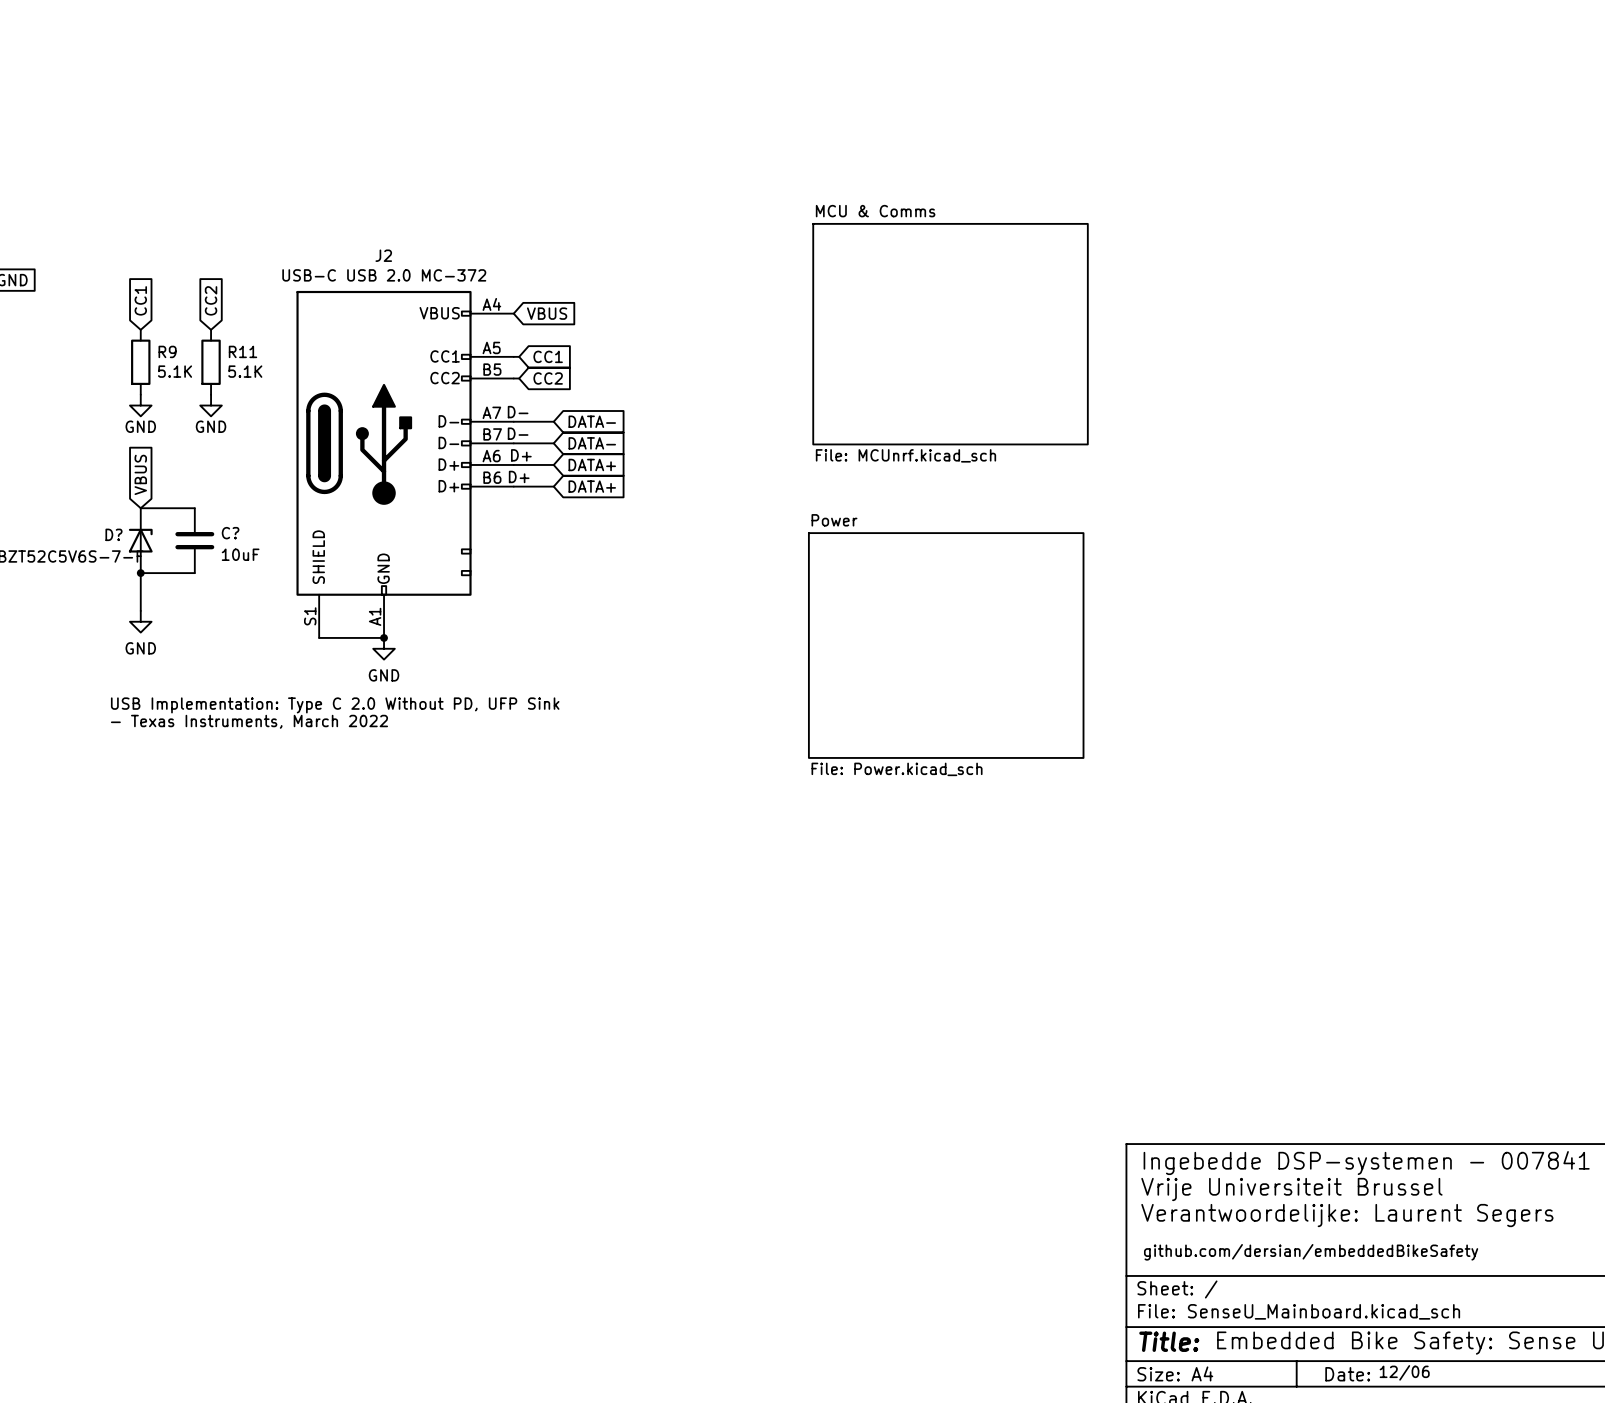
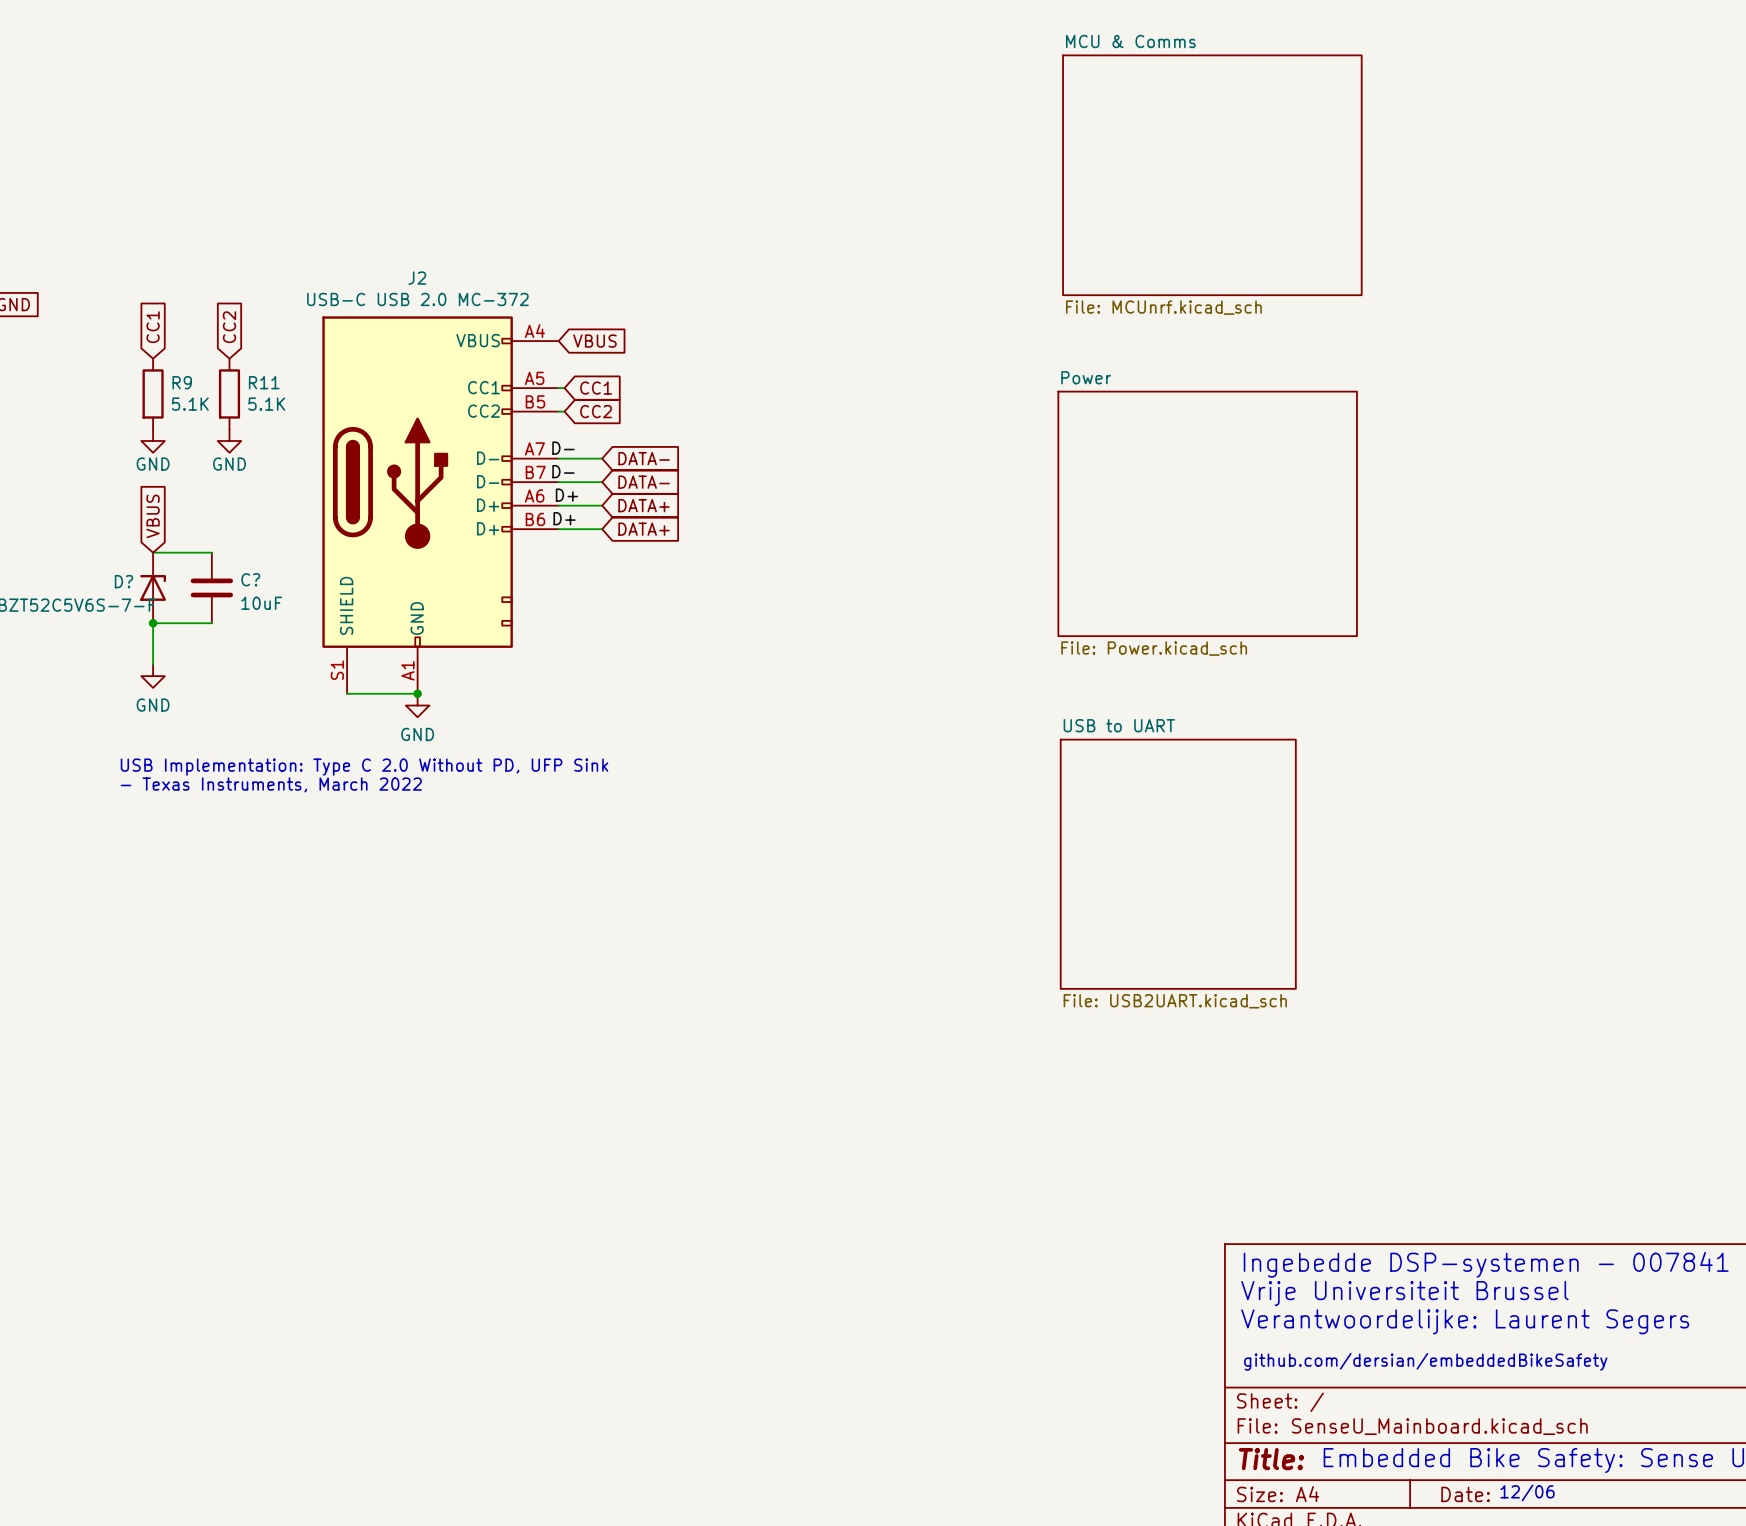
sheet MCU & Comms: none -> File: MCUnrf.kicad_sch (1212, 175)
sheet MCU & Comms: File: MCUnrf.kicad_sch (950, 334) -> none
sheet Power: none -> File: Power.kicad_sch (1207, 513)
sheet Power: File: Power.kicad_sch (946, 645) -> none
sheet USB to UART: none -> File: USB2UART.kicad_sch (1178, 864)

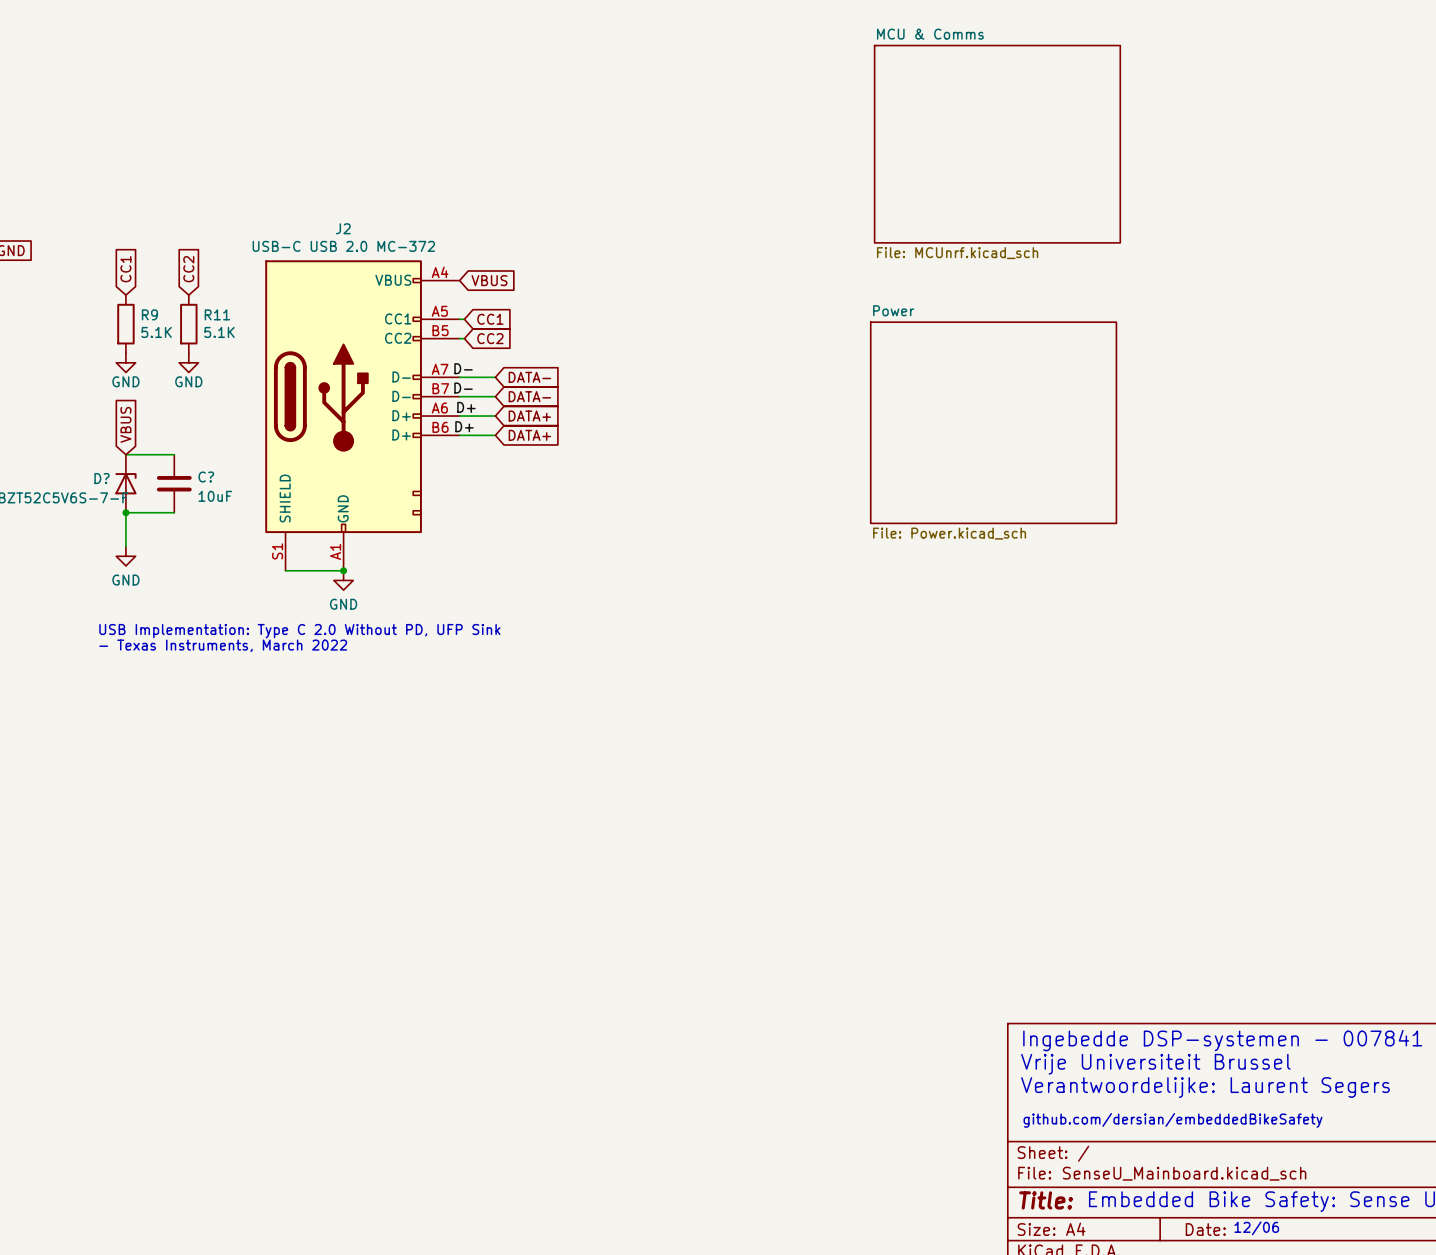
sheet USB to UART: File: USB2UART.kicad_sch (1178, 864) -> none

